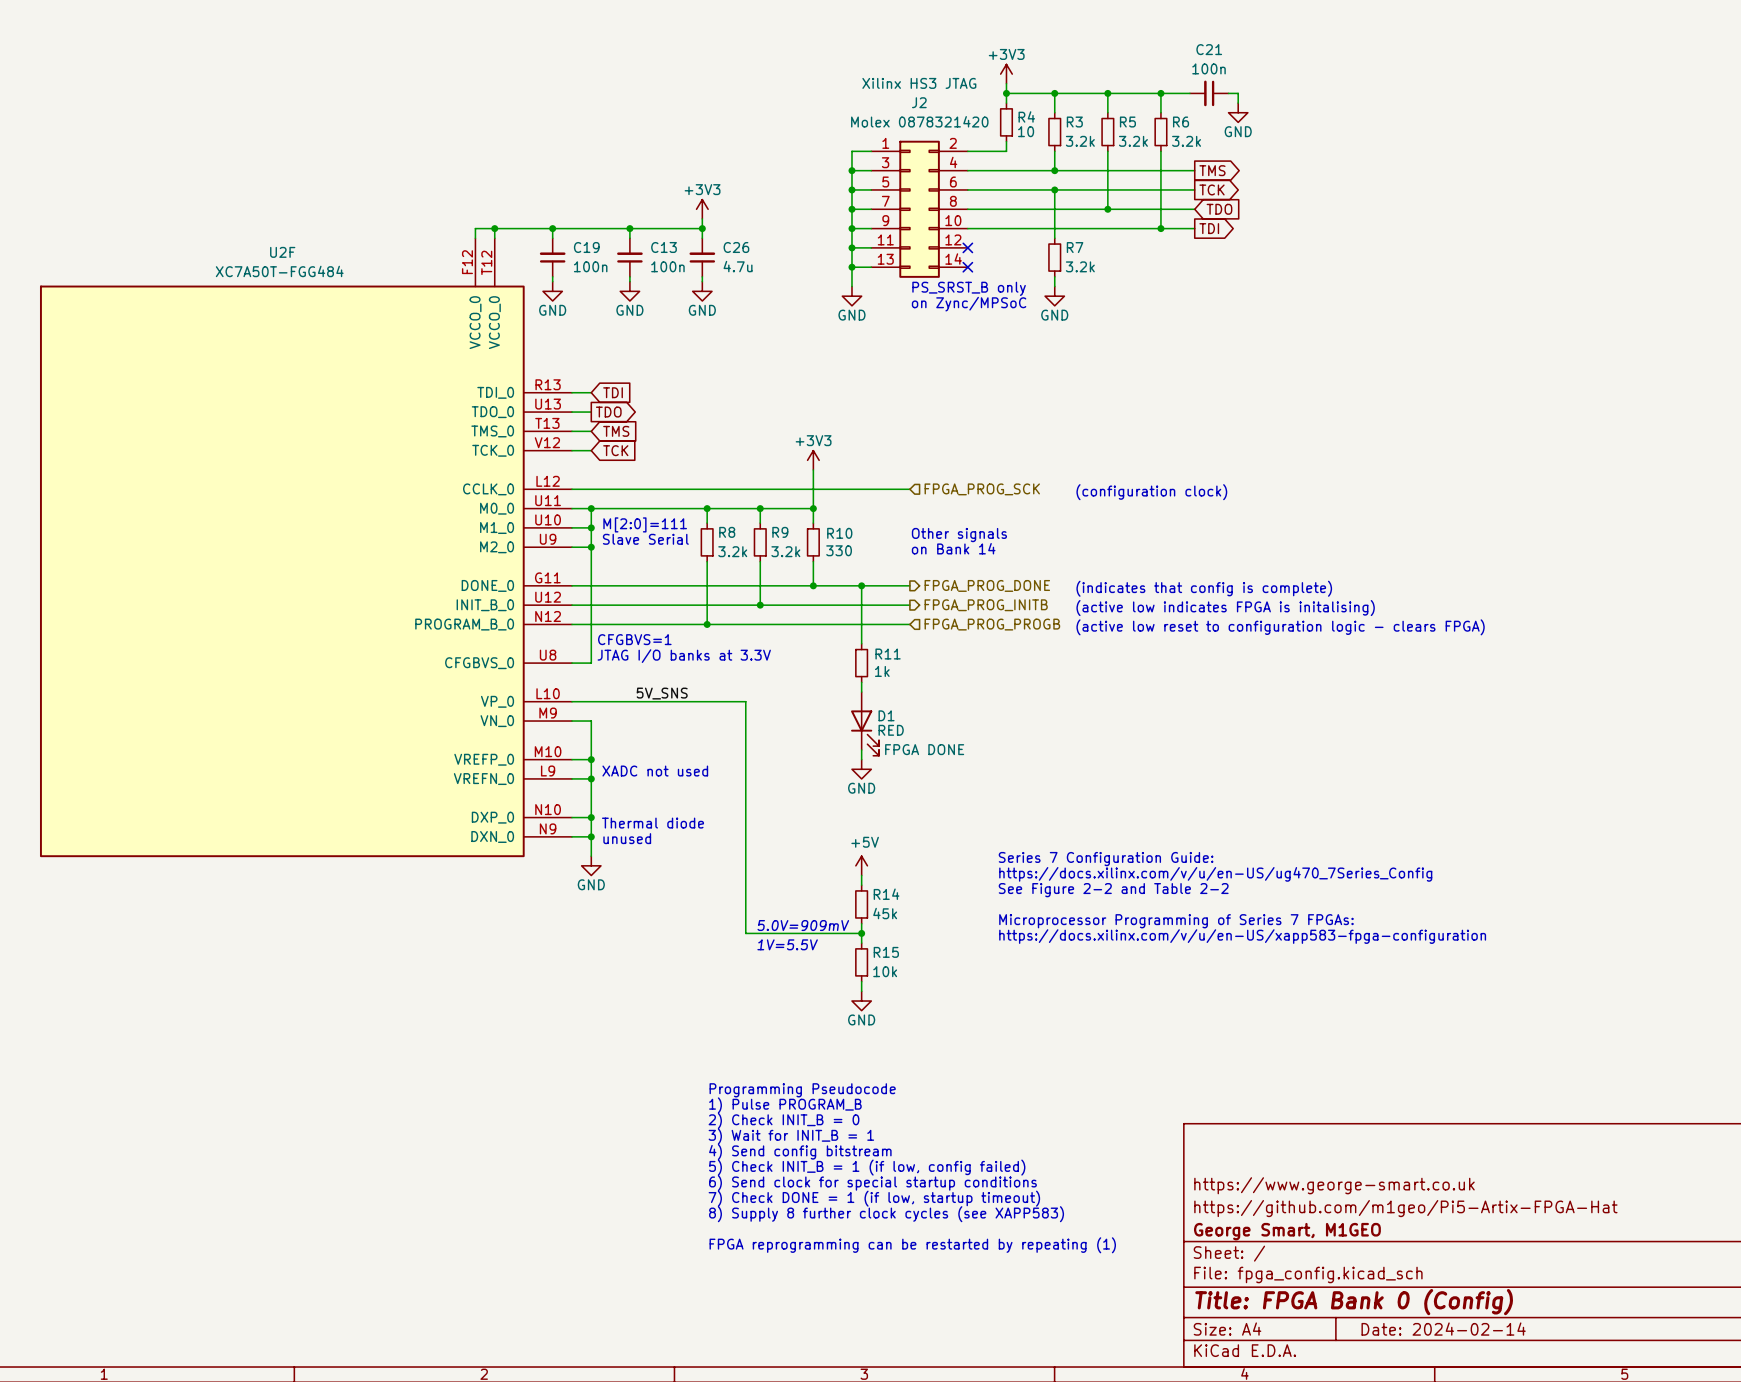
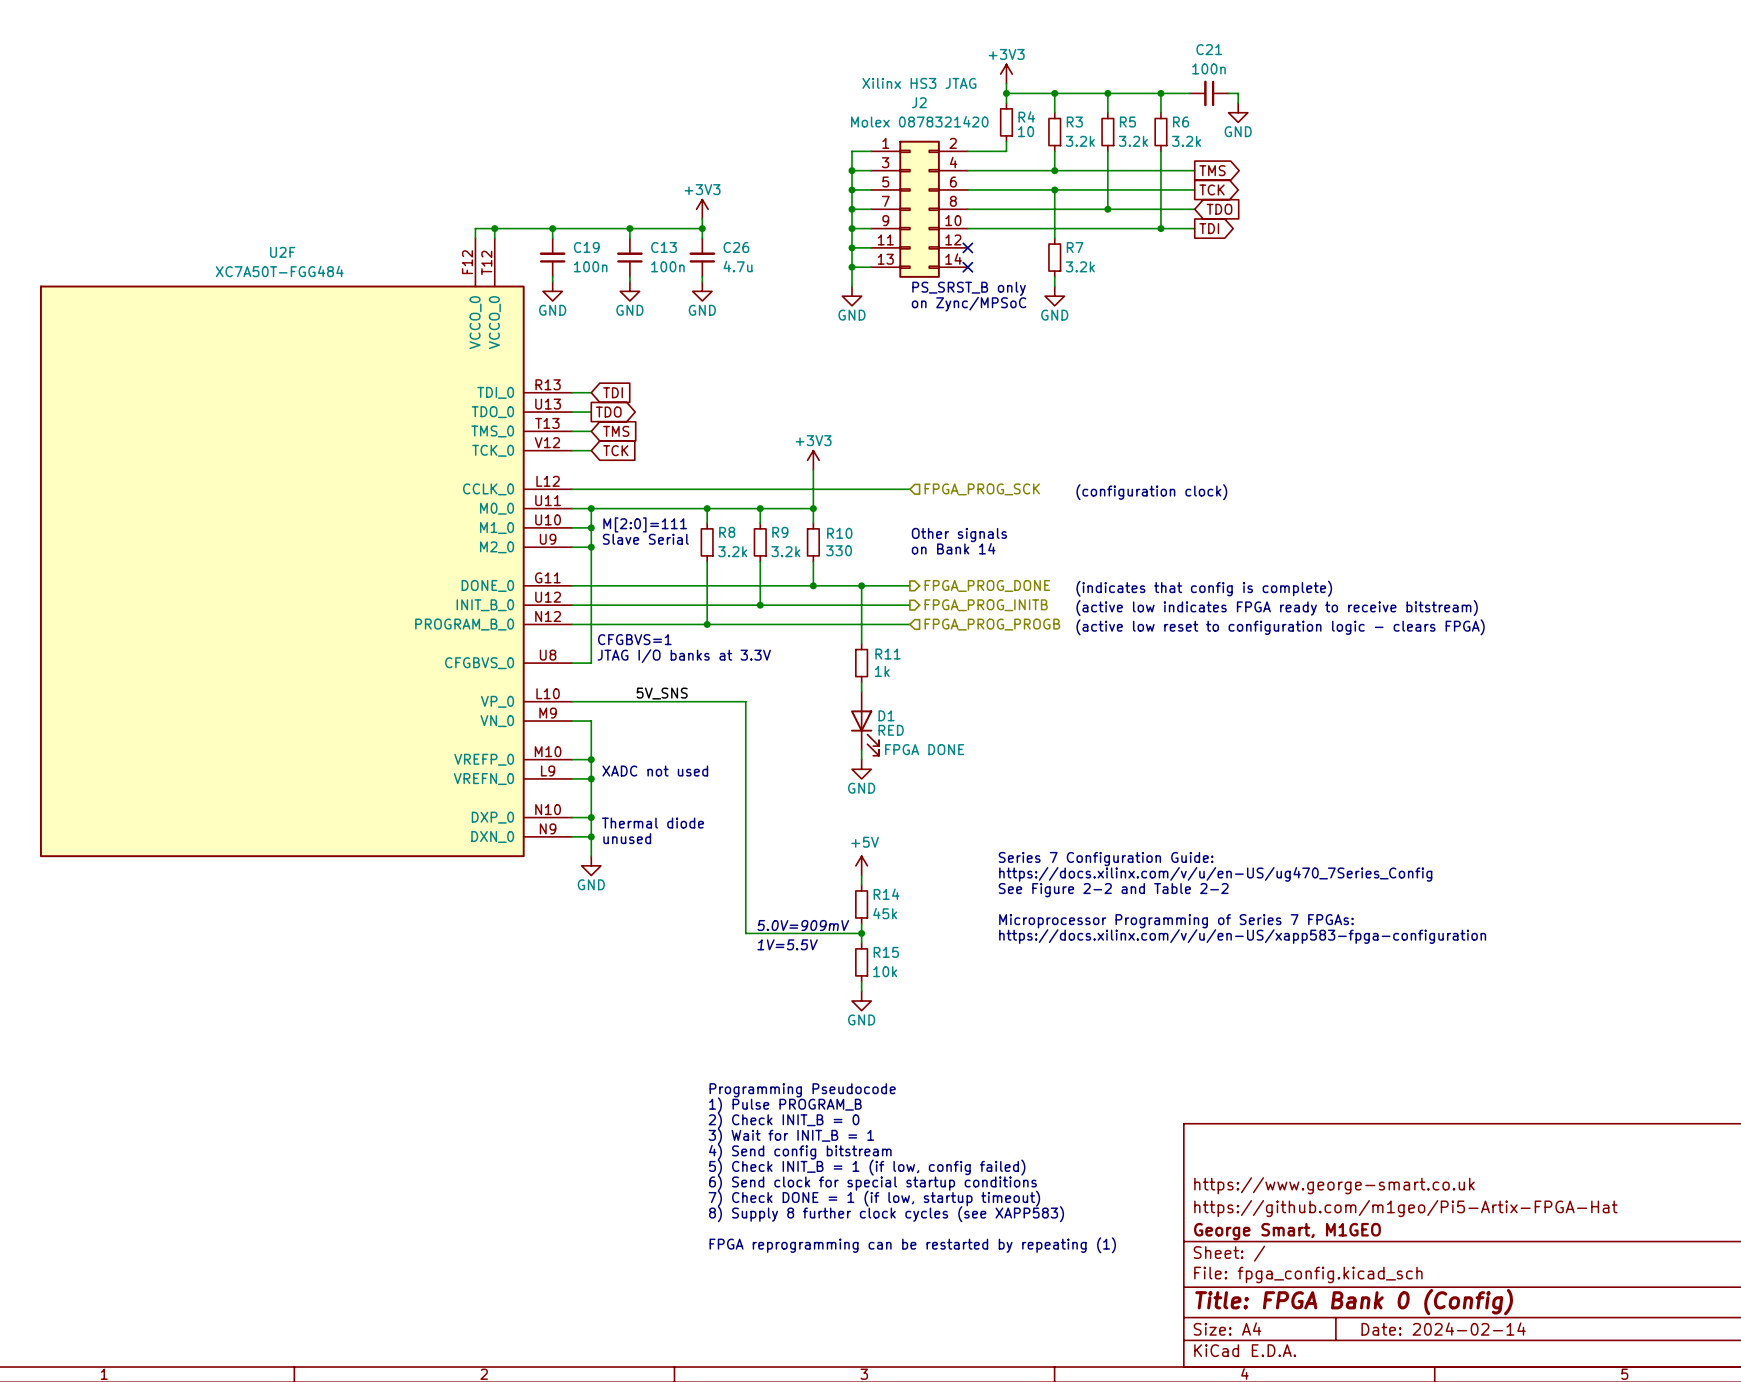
text: (active low indicates FPGA is initalising) (1225, 608) -> (active low indicates FPGA ready to receive bitstream) (1277, 608)

